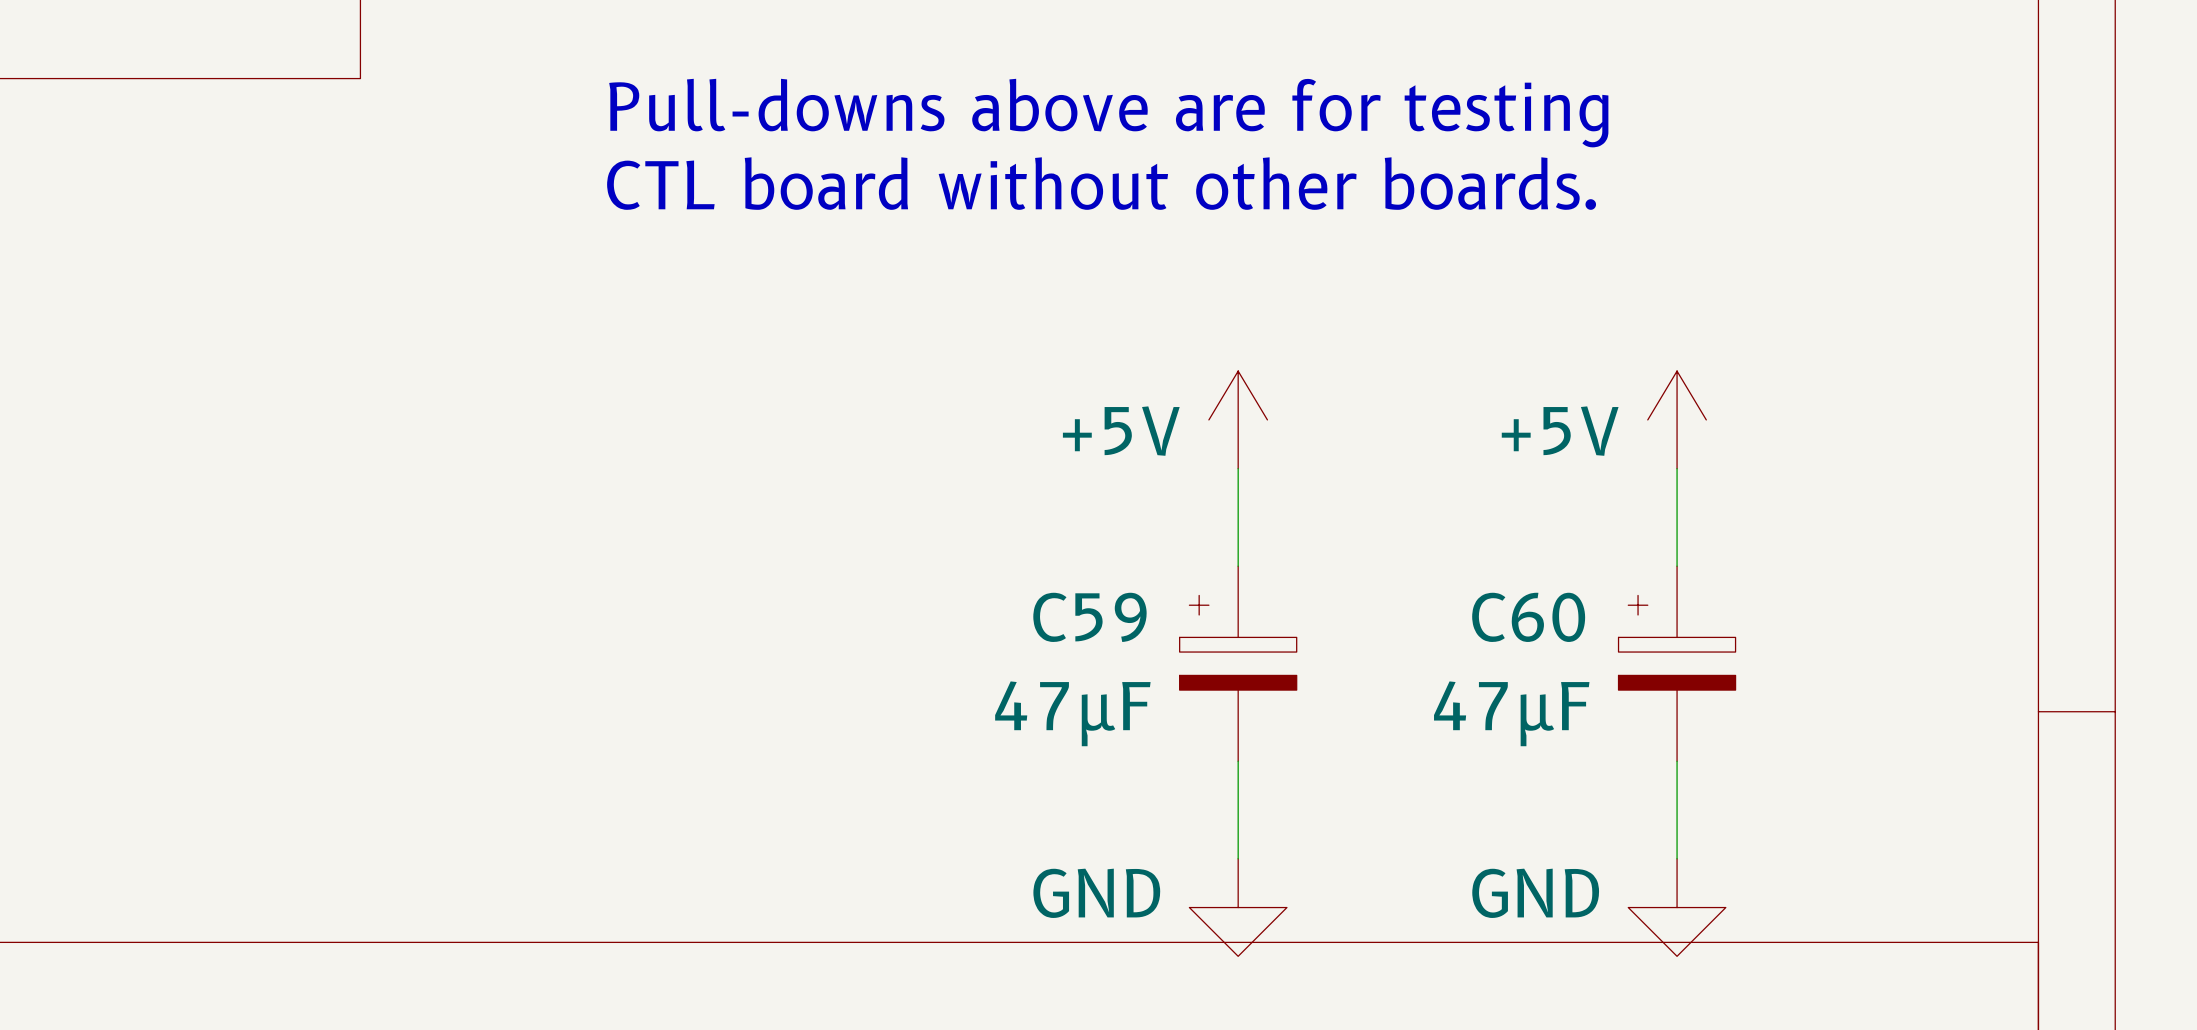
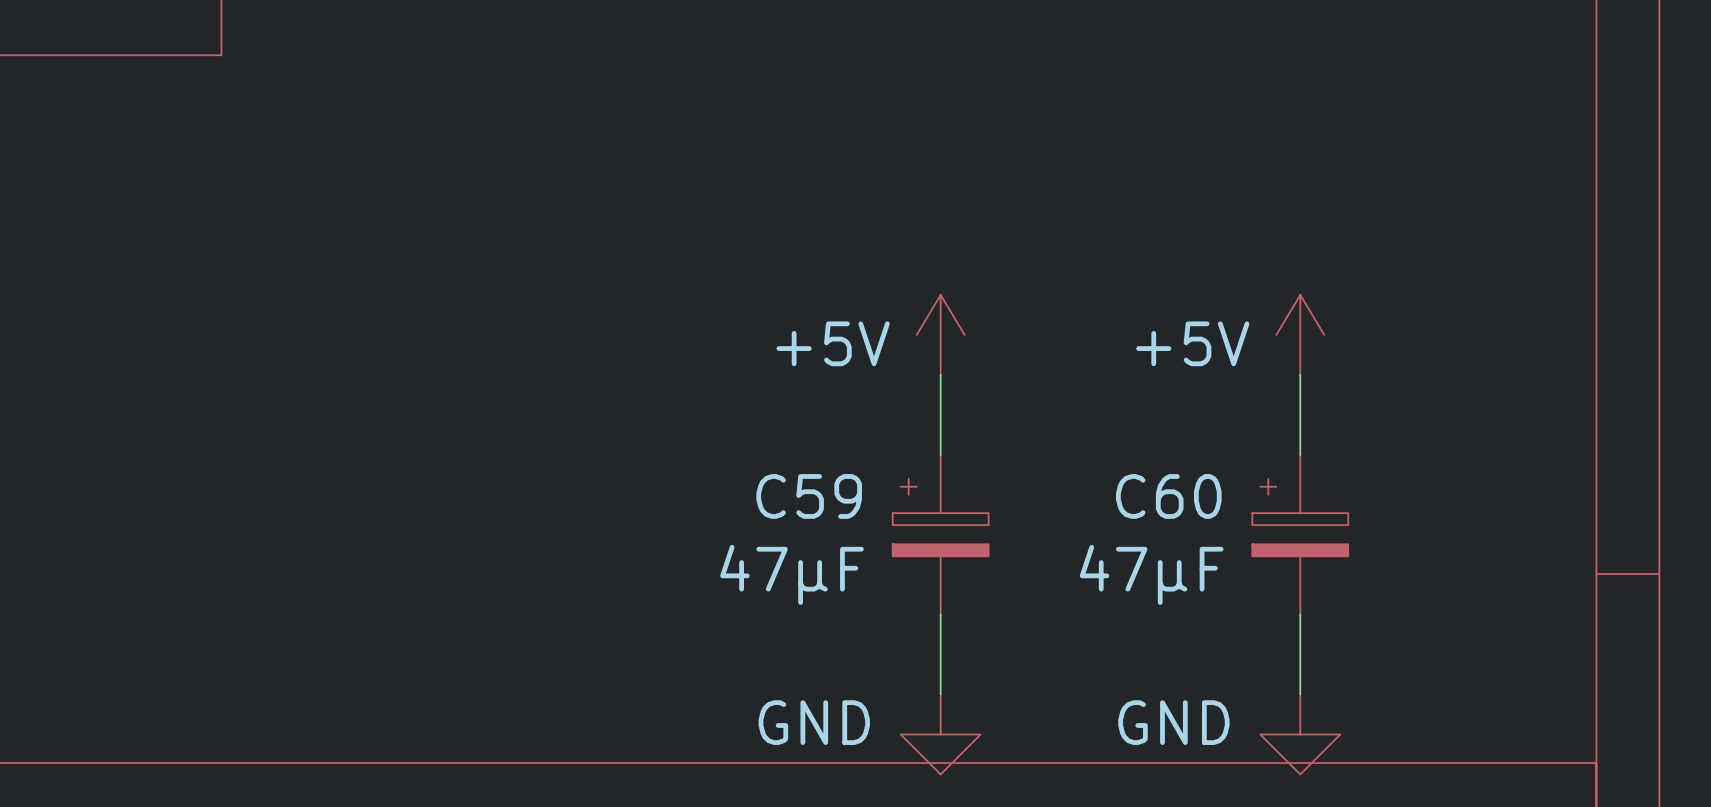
text: Pull-downs above are for testing (1108, 113) -> none
text: CTL board without other boards. (1101, 183) -> none

